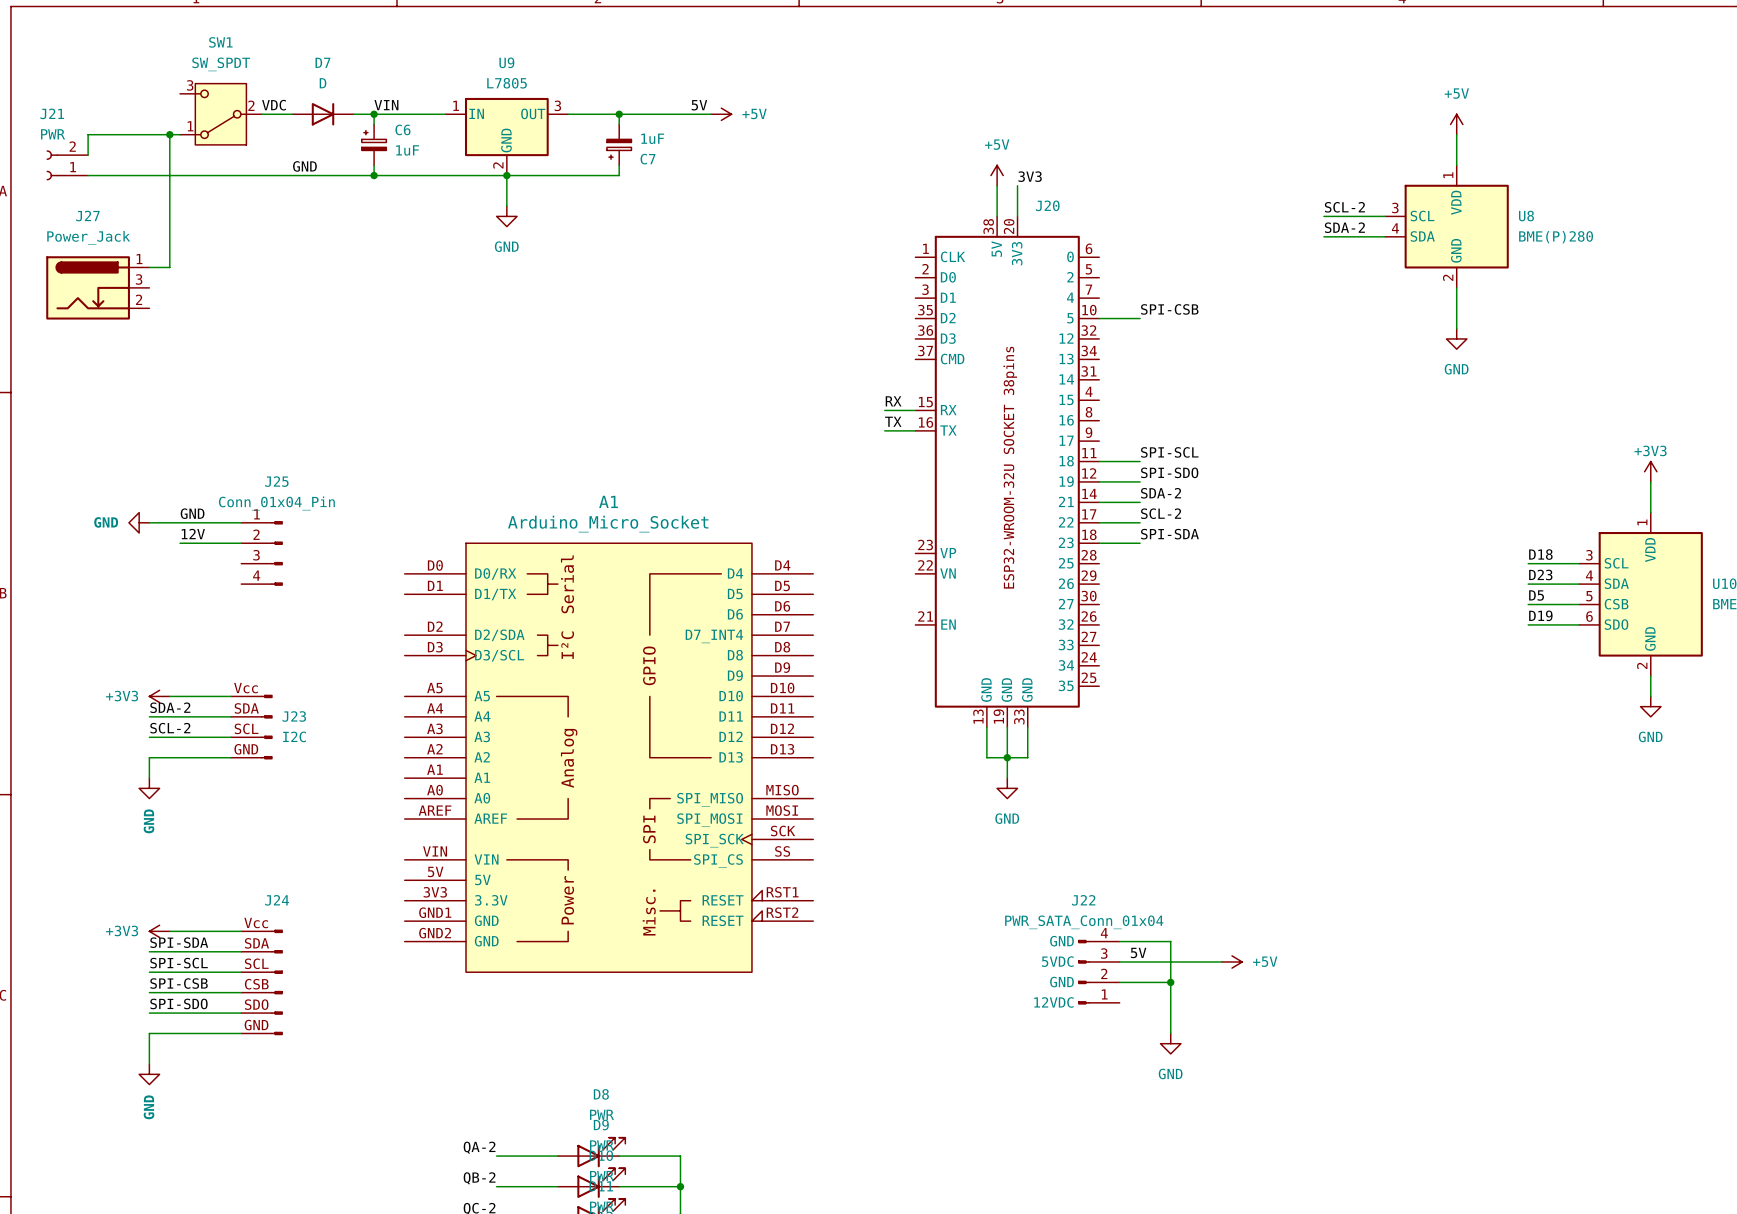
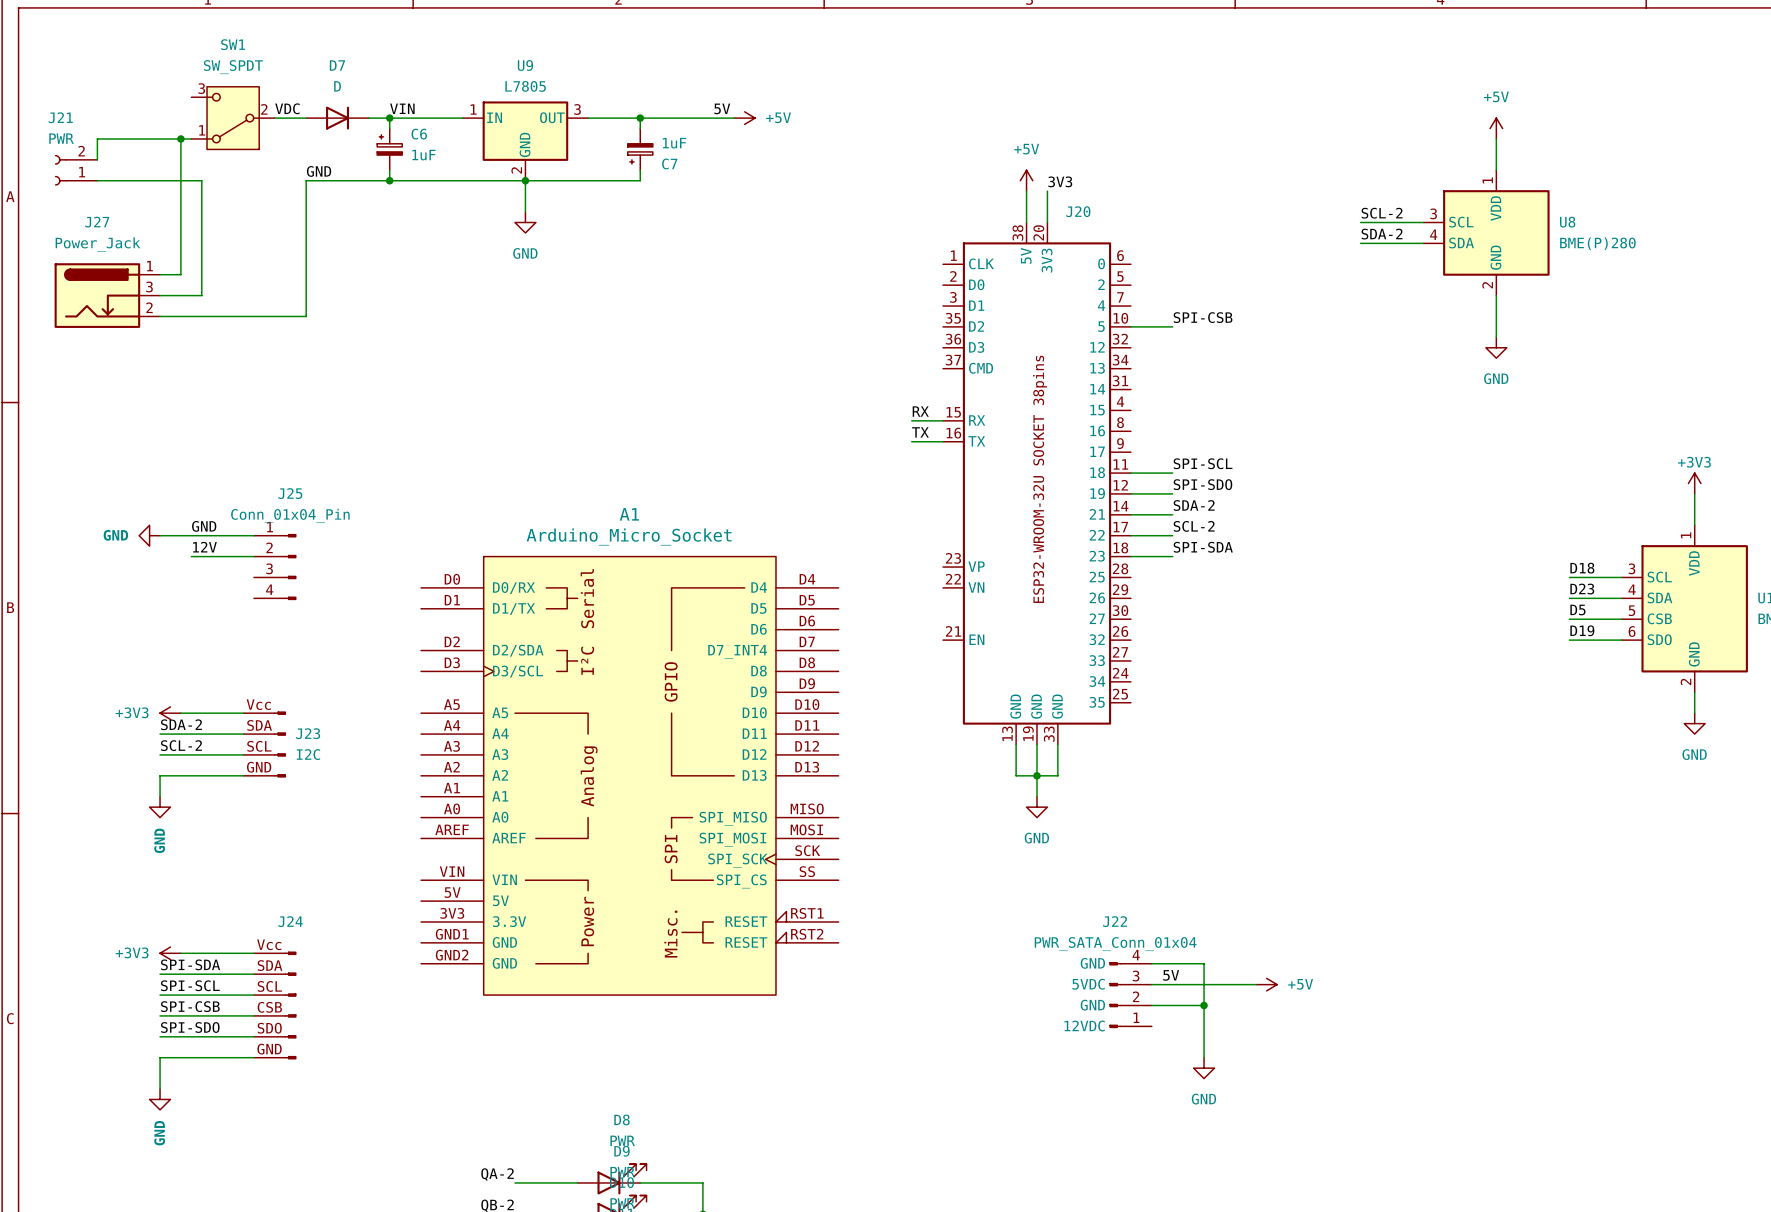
wire: (190, 175) (292, 175) -> (160, 316) (306, 316) (306, 180)
wire: none -> (201, 180) (201, 295) (160, 295)

